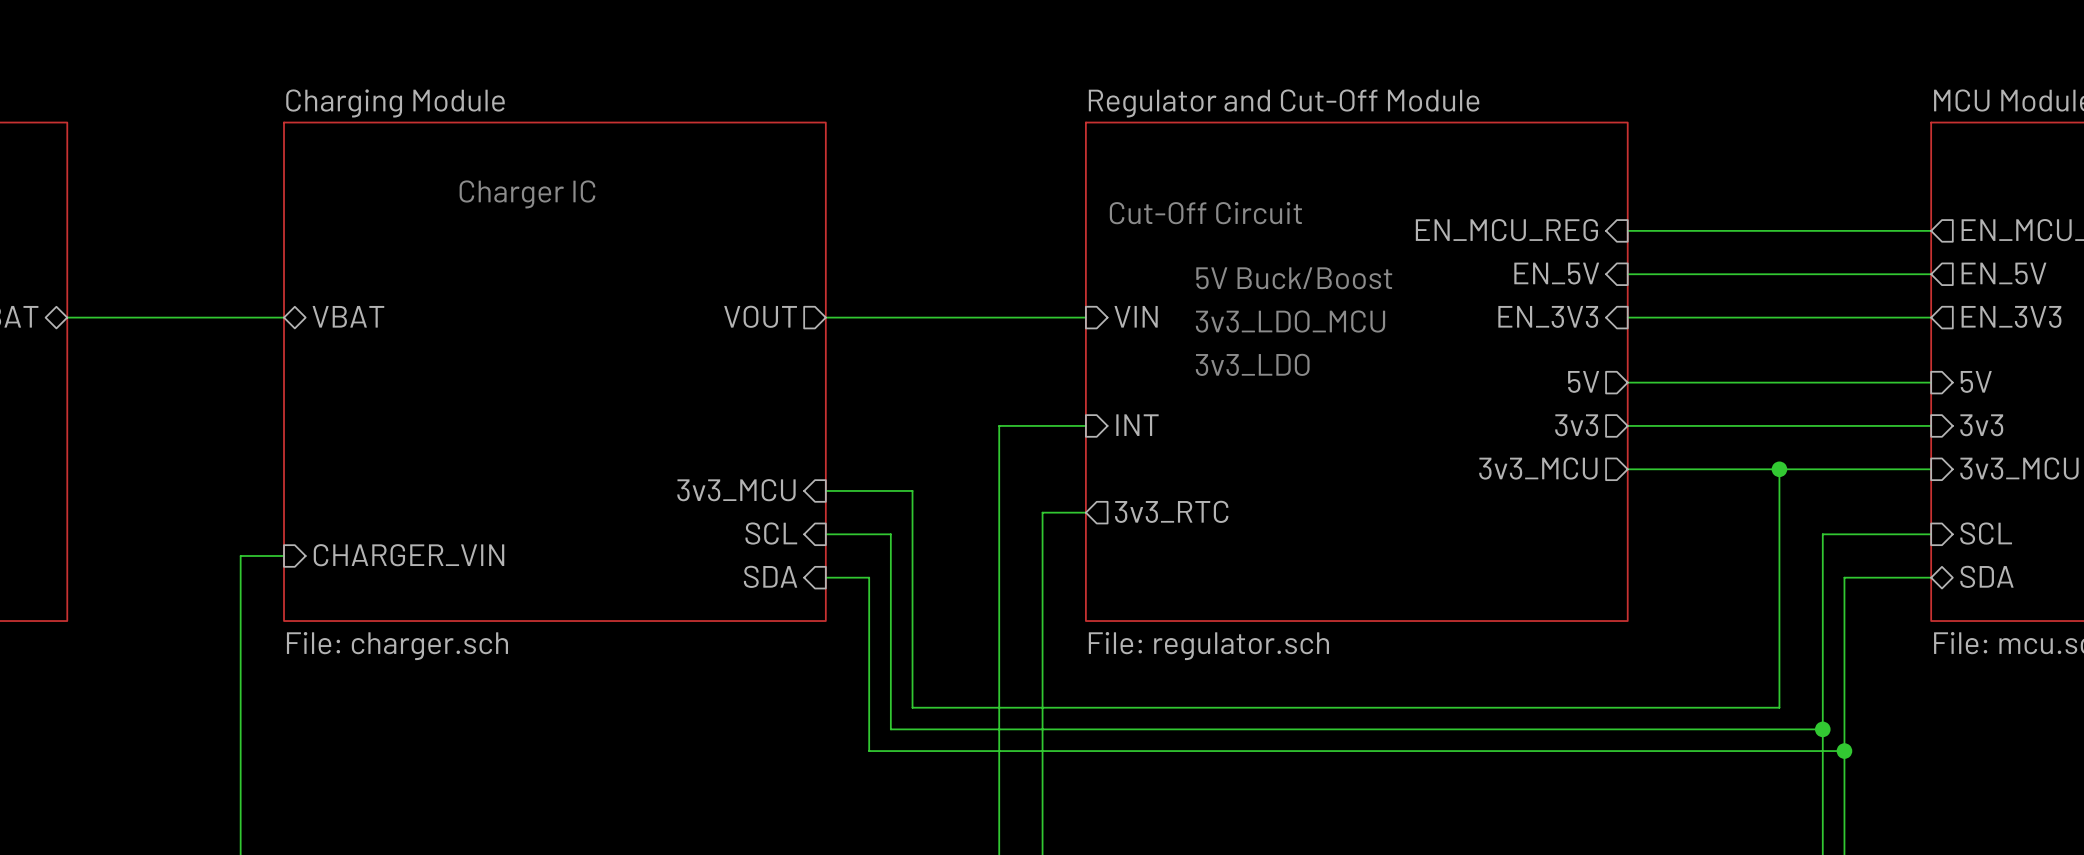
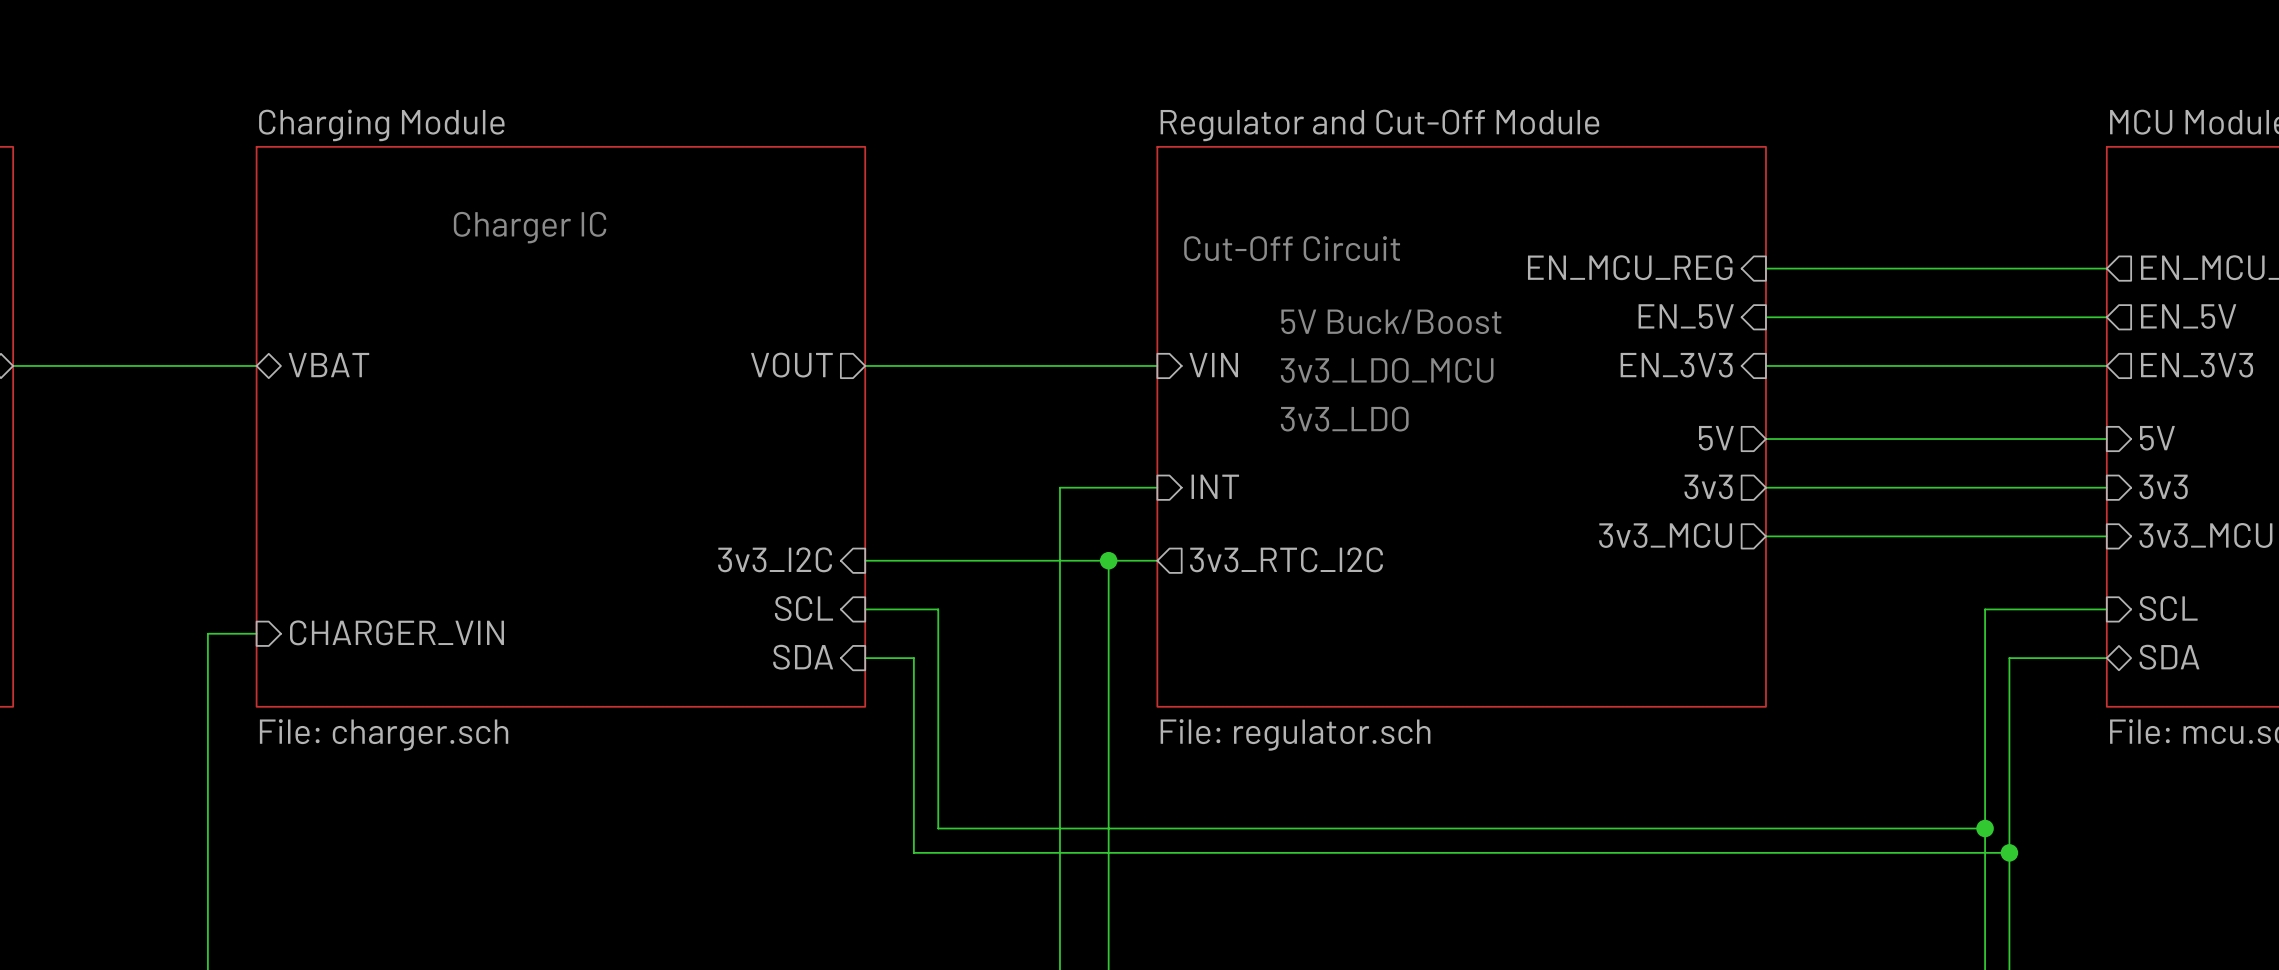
wire: (1779, 469) (1779, 707) (912, 707) (912, 490) -> (1157, 560) (962, 560)
junction: (1779, 469) -> none
sheet pin: 3v3_MCU (736, 490) -> 3v3_I2C (775, 559)
junction: none -> (1108, 560)
sheet pin: 3v3_RTC (1171, 511) -> 3v3_RTC_I2C (1286, 559)
wire: (1042, 512) (1085, 512) -> (1108, 585) (1108, 560)

